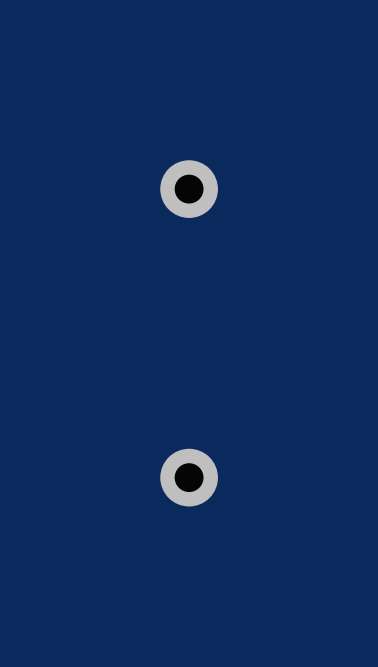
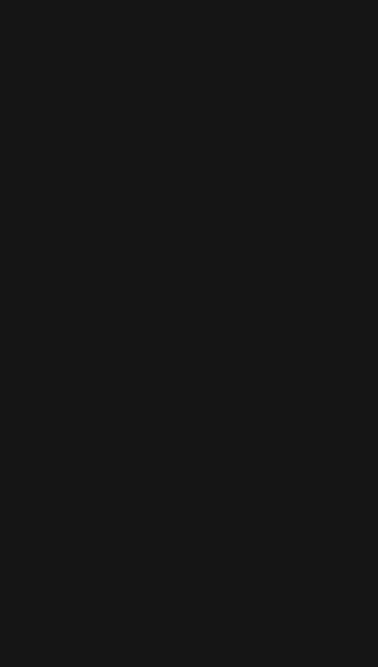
via: (189, 189) -> none
via: (189, 477) -> none

